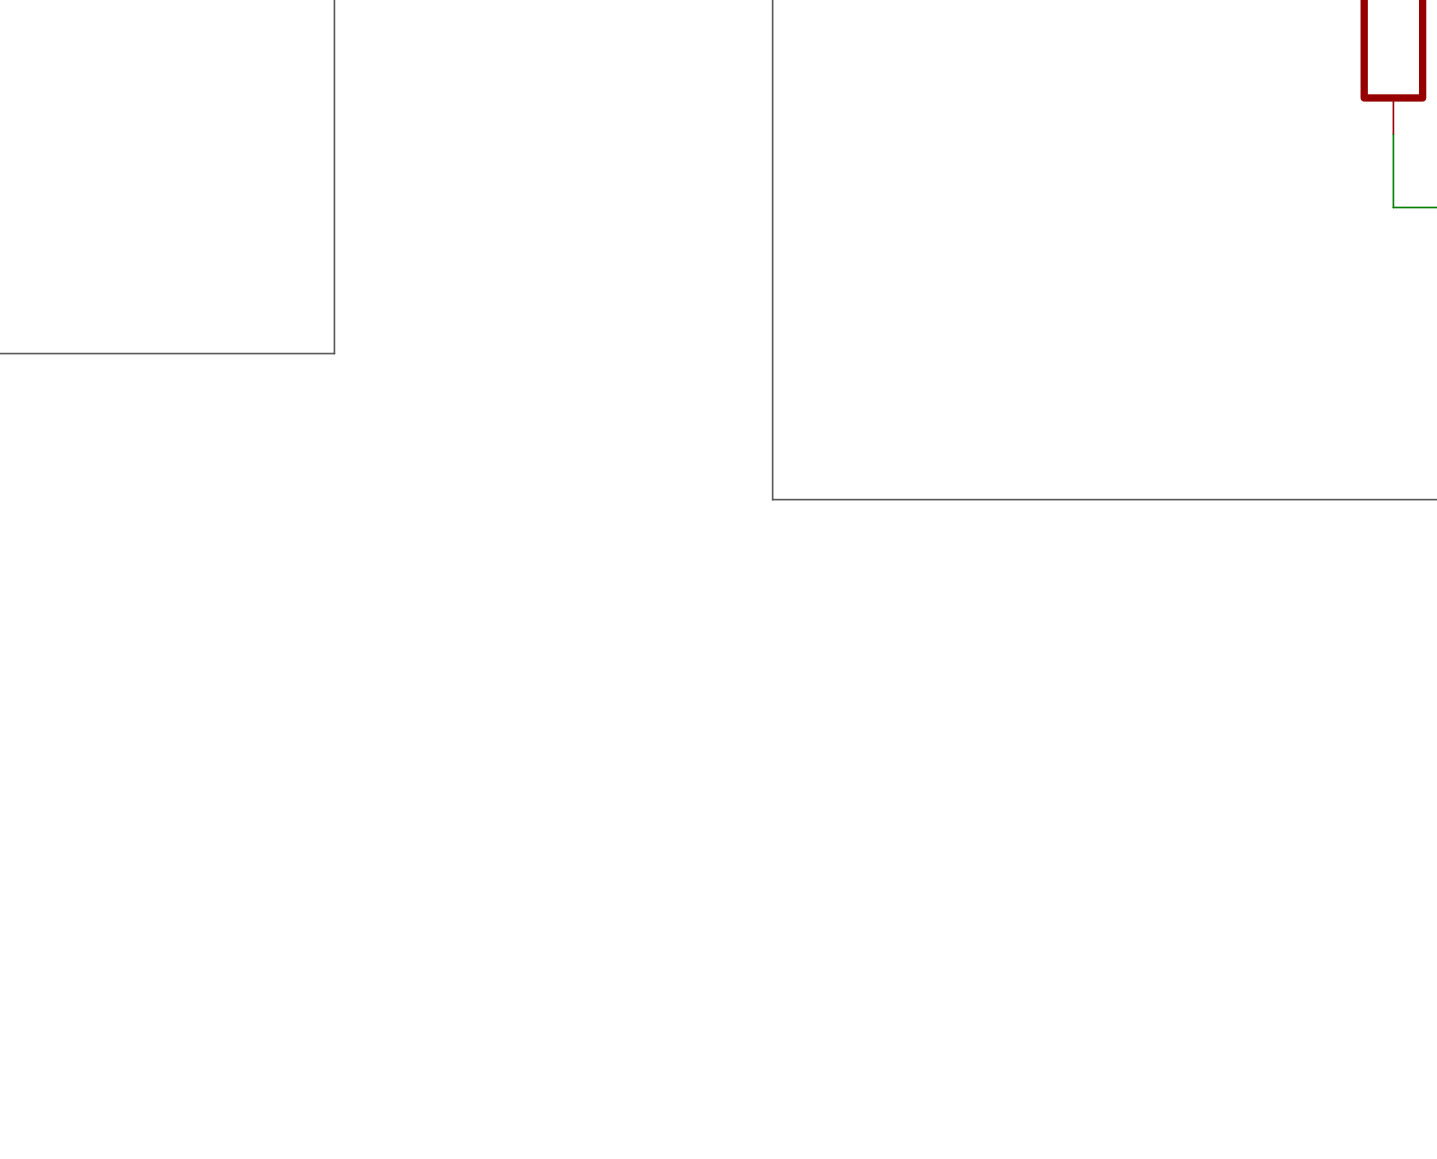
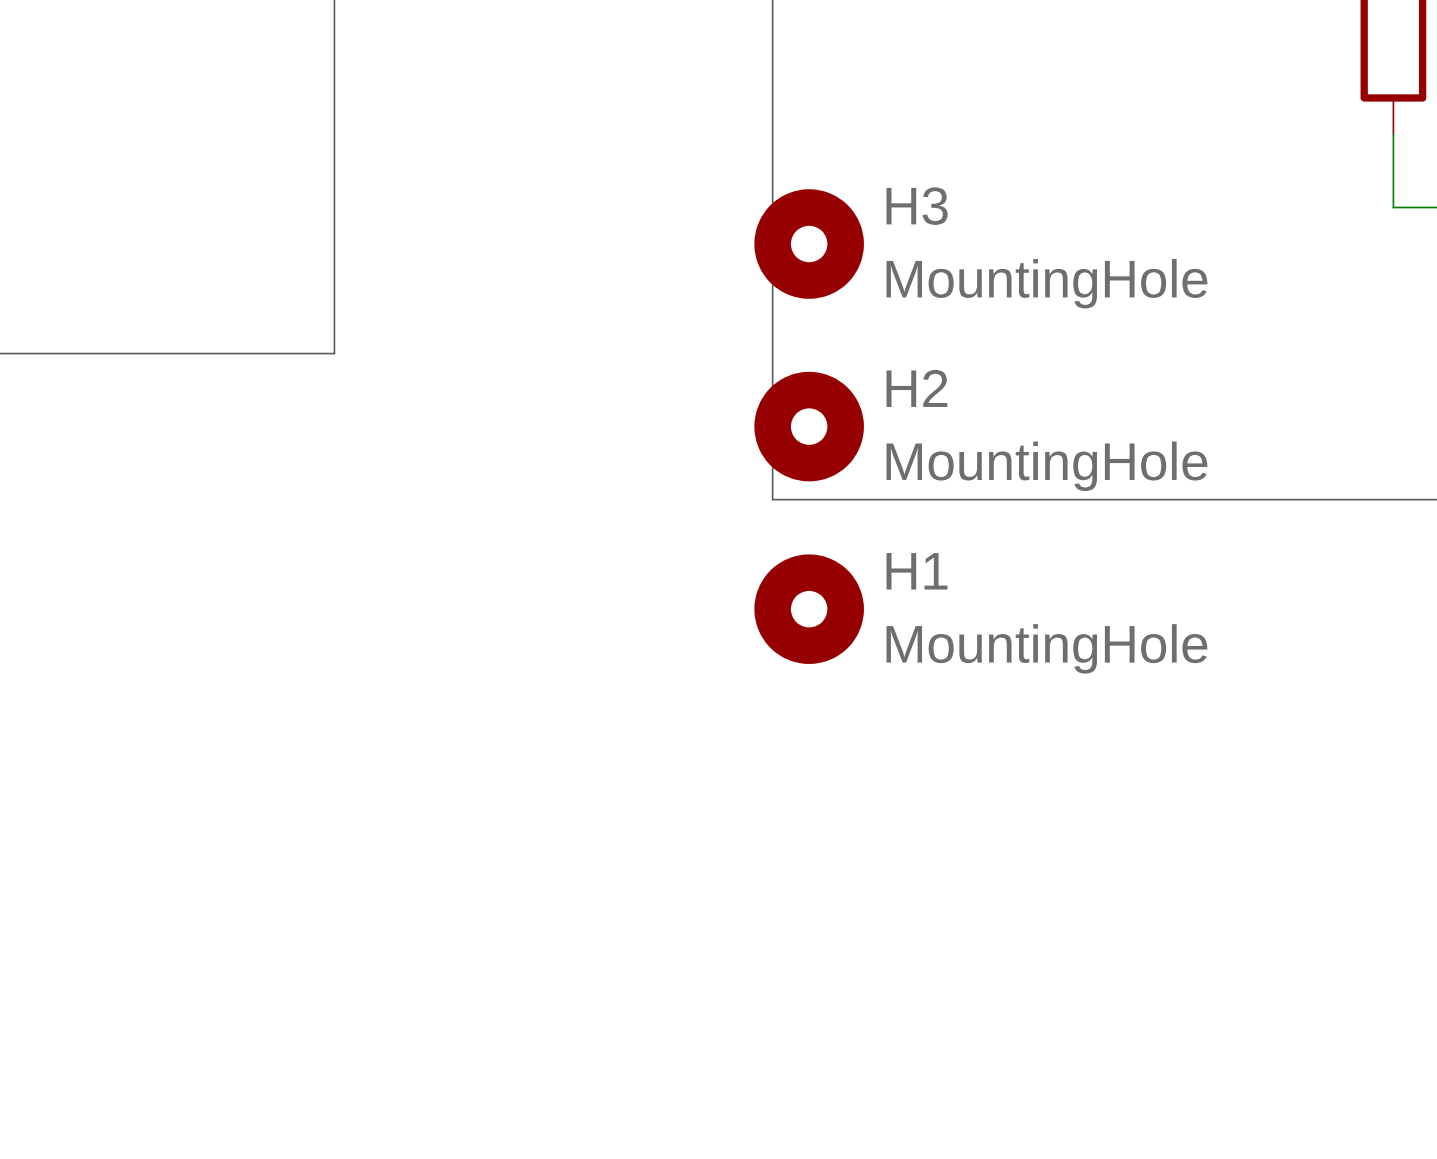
H3: none -> MountingHole (809, 244)
H2: none -> MountingHole (809, 426)
H1: none -> MountingHole (809, 609)

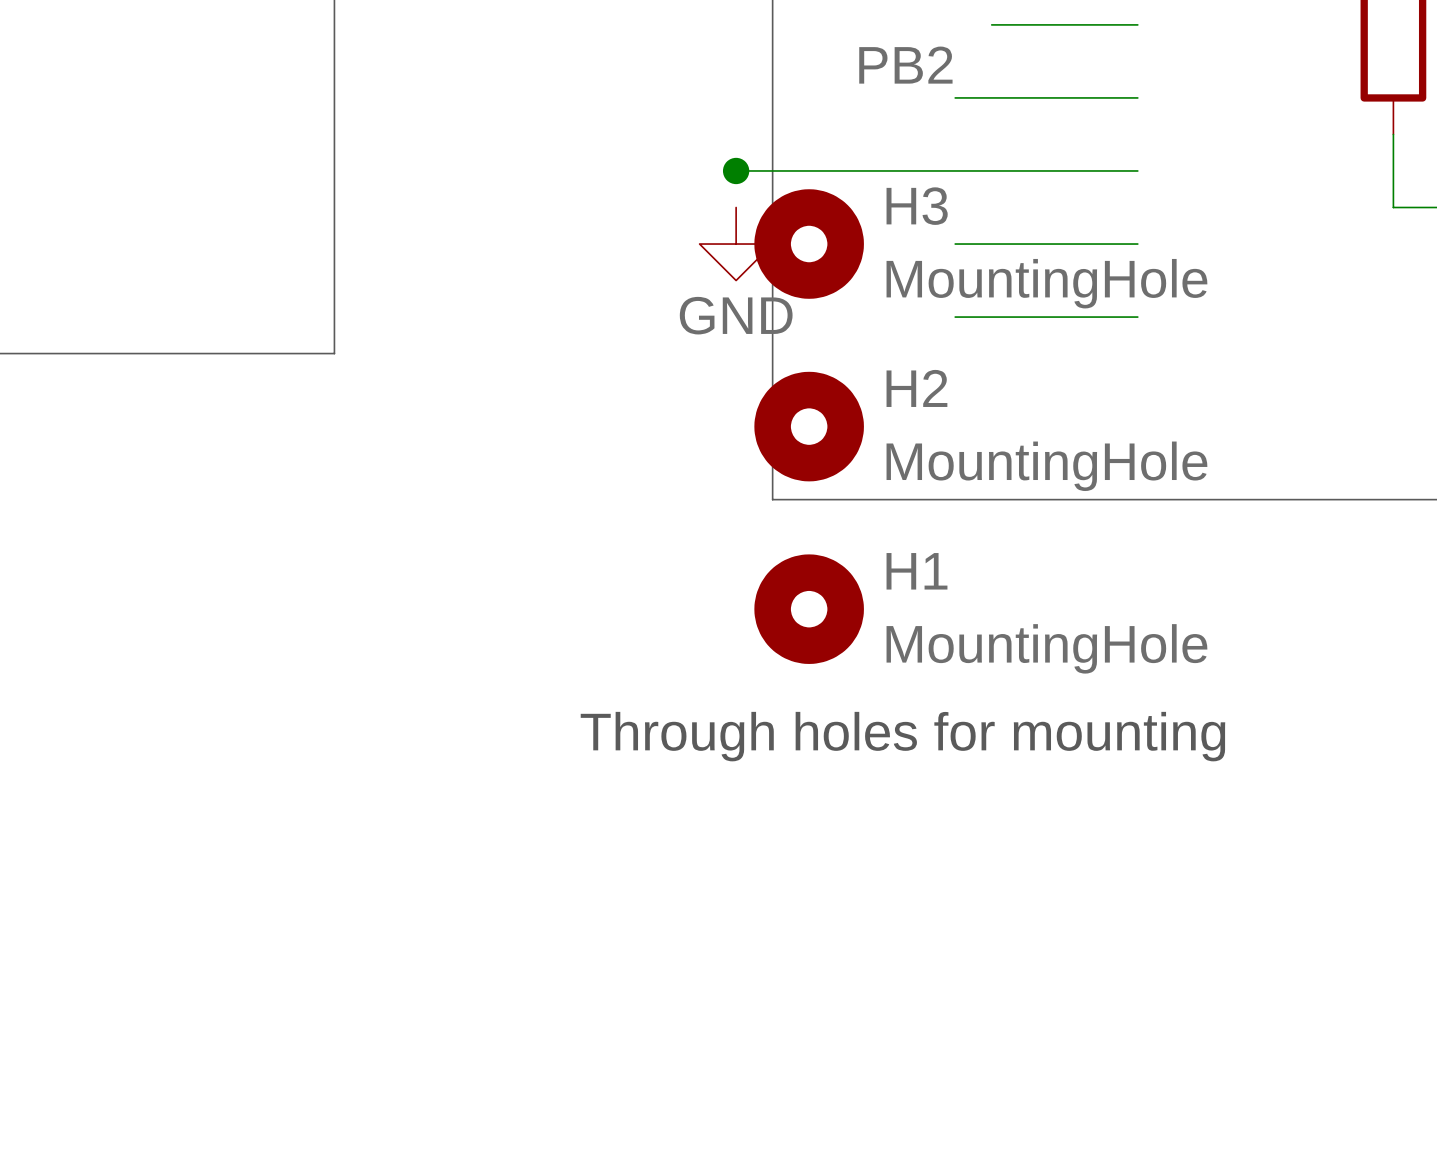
wire: none -> (991, 24) (1137, 24)
label: none -> PB2 (905, 65)
wire: none -> (955, 97) (1137, 97)
wire: none -> (736, 170) (1137, 170)
junction: none -> (736, 170)
power symbol: none -> GND (736, 244)
wire: none -> (955, 244) (1137, 244)
wire: none -> (955, 317) (1137, 317)
text: none -> Through holes for mounting (902, 736)

